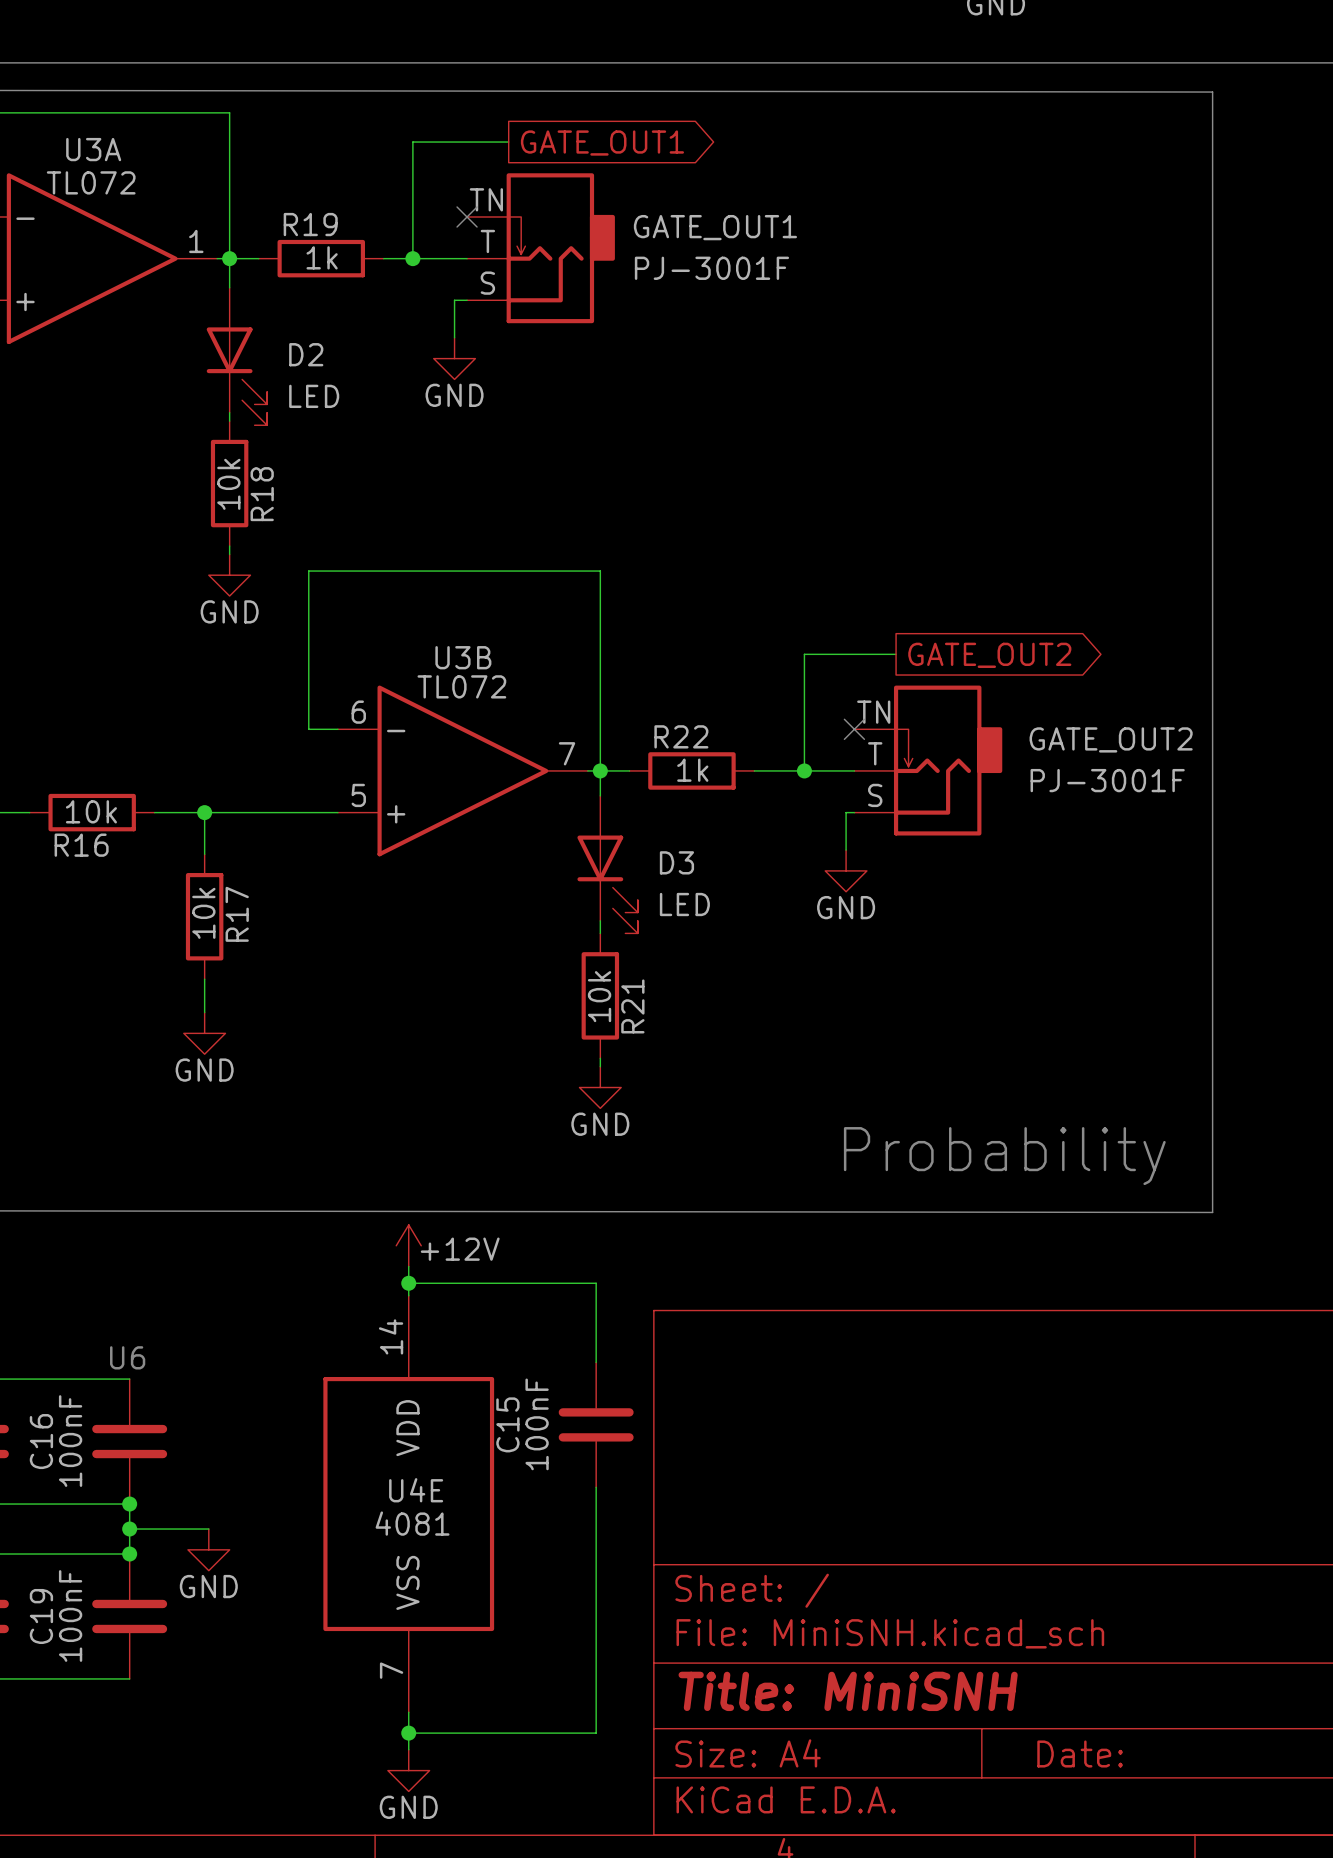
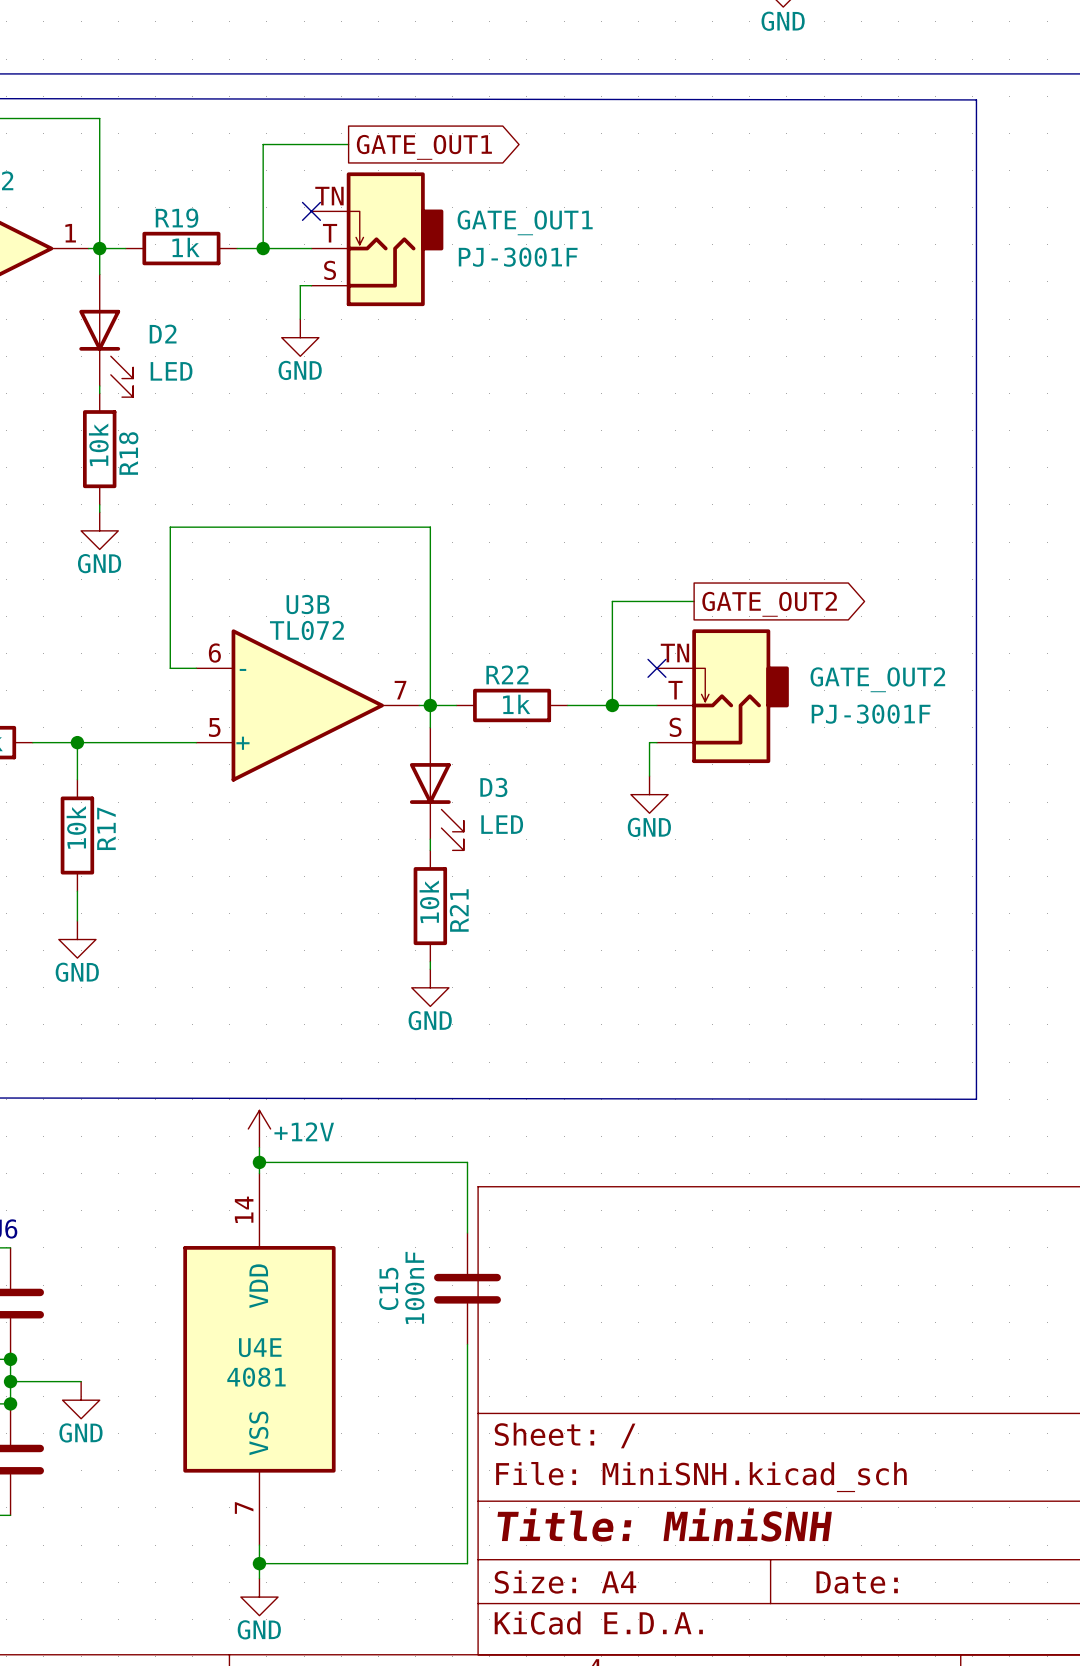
text: Probability (1004, 1156) -> none
wire: (596, 1283) (596, 1362) -> (426, 1162) (467, 1162) (467, 1233)
C15 position: (596, 1424) -> (467, 1288)
wire: (596, 1487) (596, 1733) -> (467, 1344) (467, 1563) (426, 1563)

